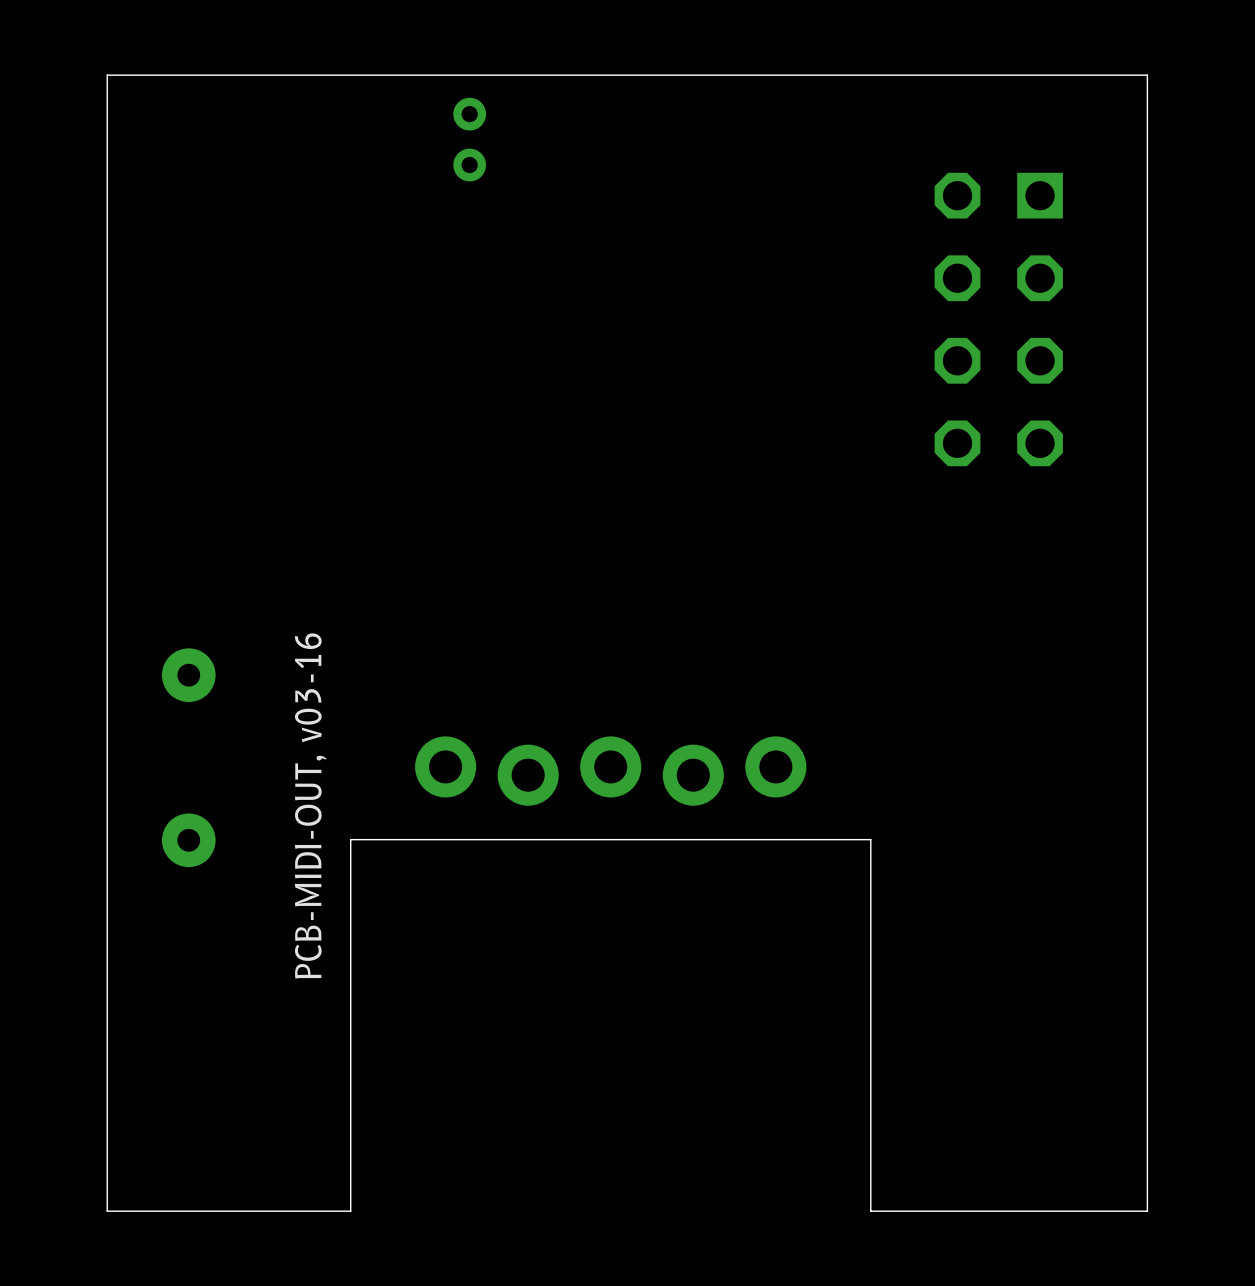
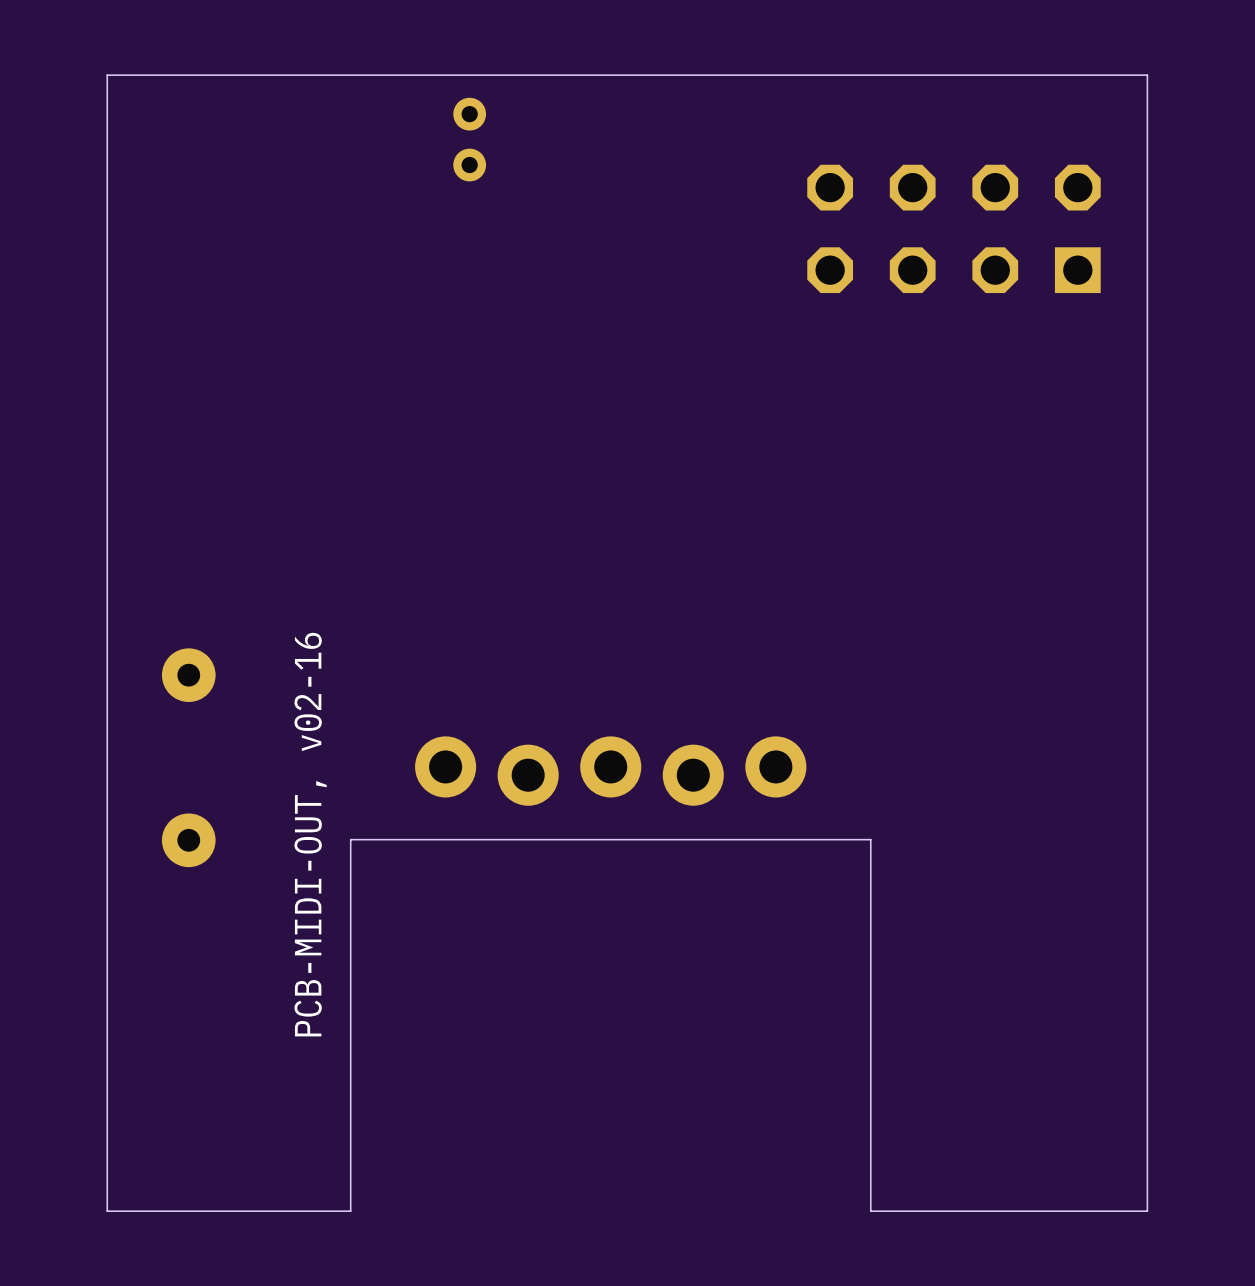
part rotation: 0° (998, 319) -> 90° clockwise (953, 228)
text: PCB-MIDI-OUT, v03-16 (310, 805) -> PCB-MIDI-OUT, v02-16 (310, 834)

